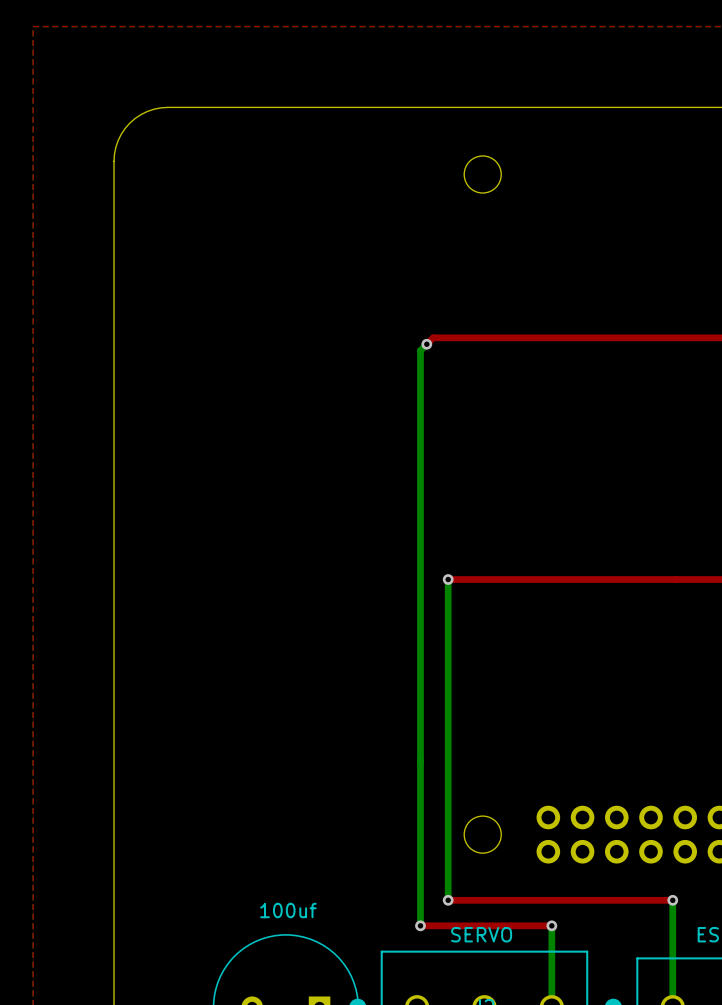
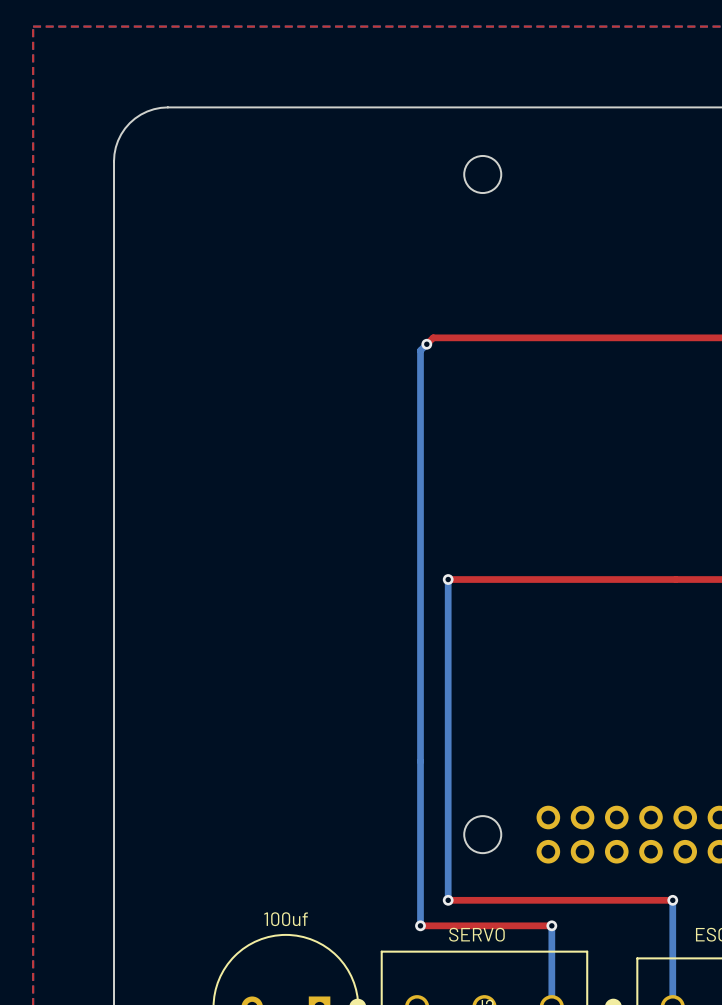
text: 100uf (288, 910) -> none
part value: none -> 100uf (286, 919)

